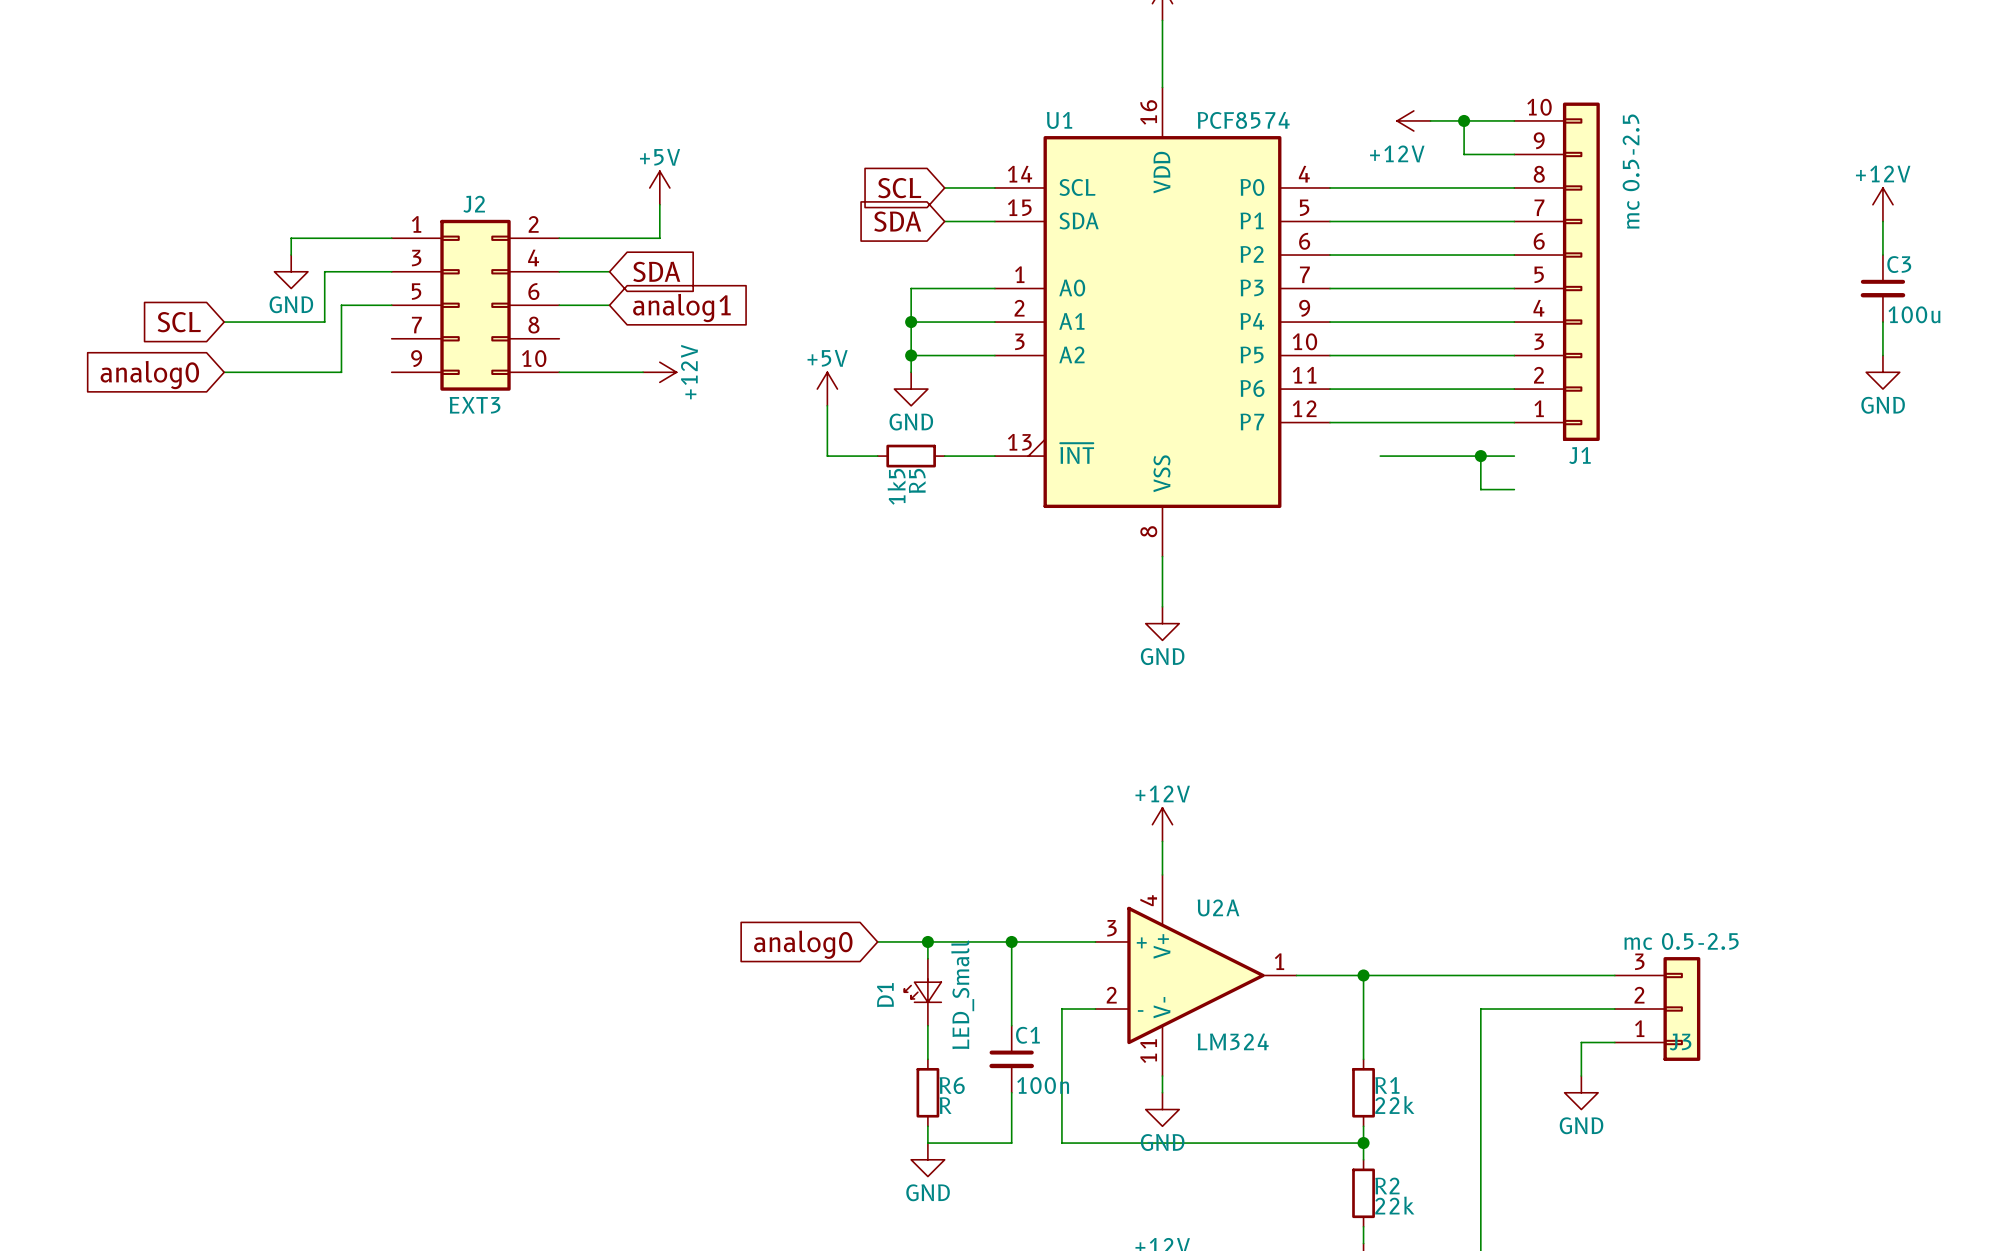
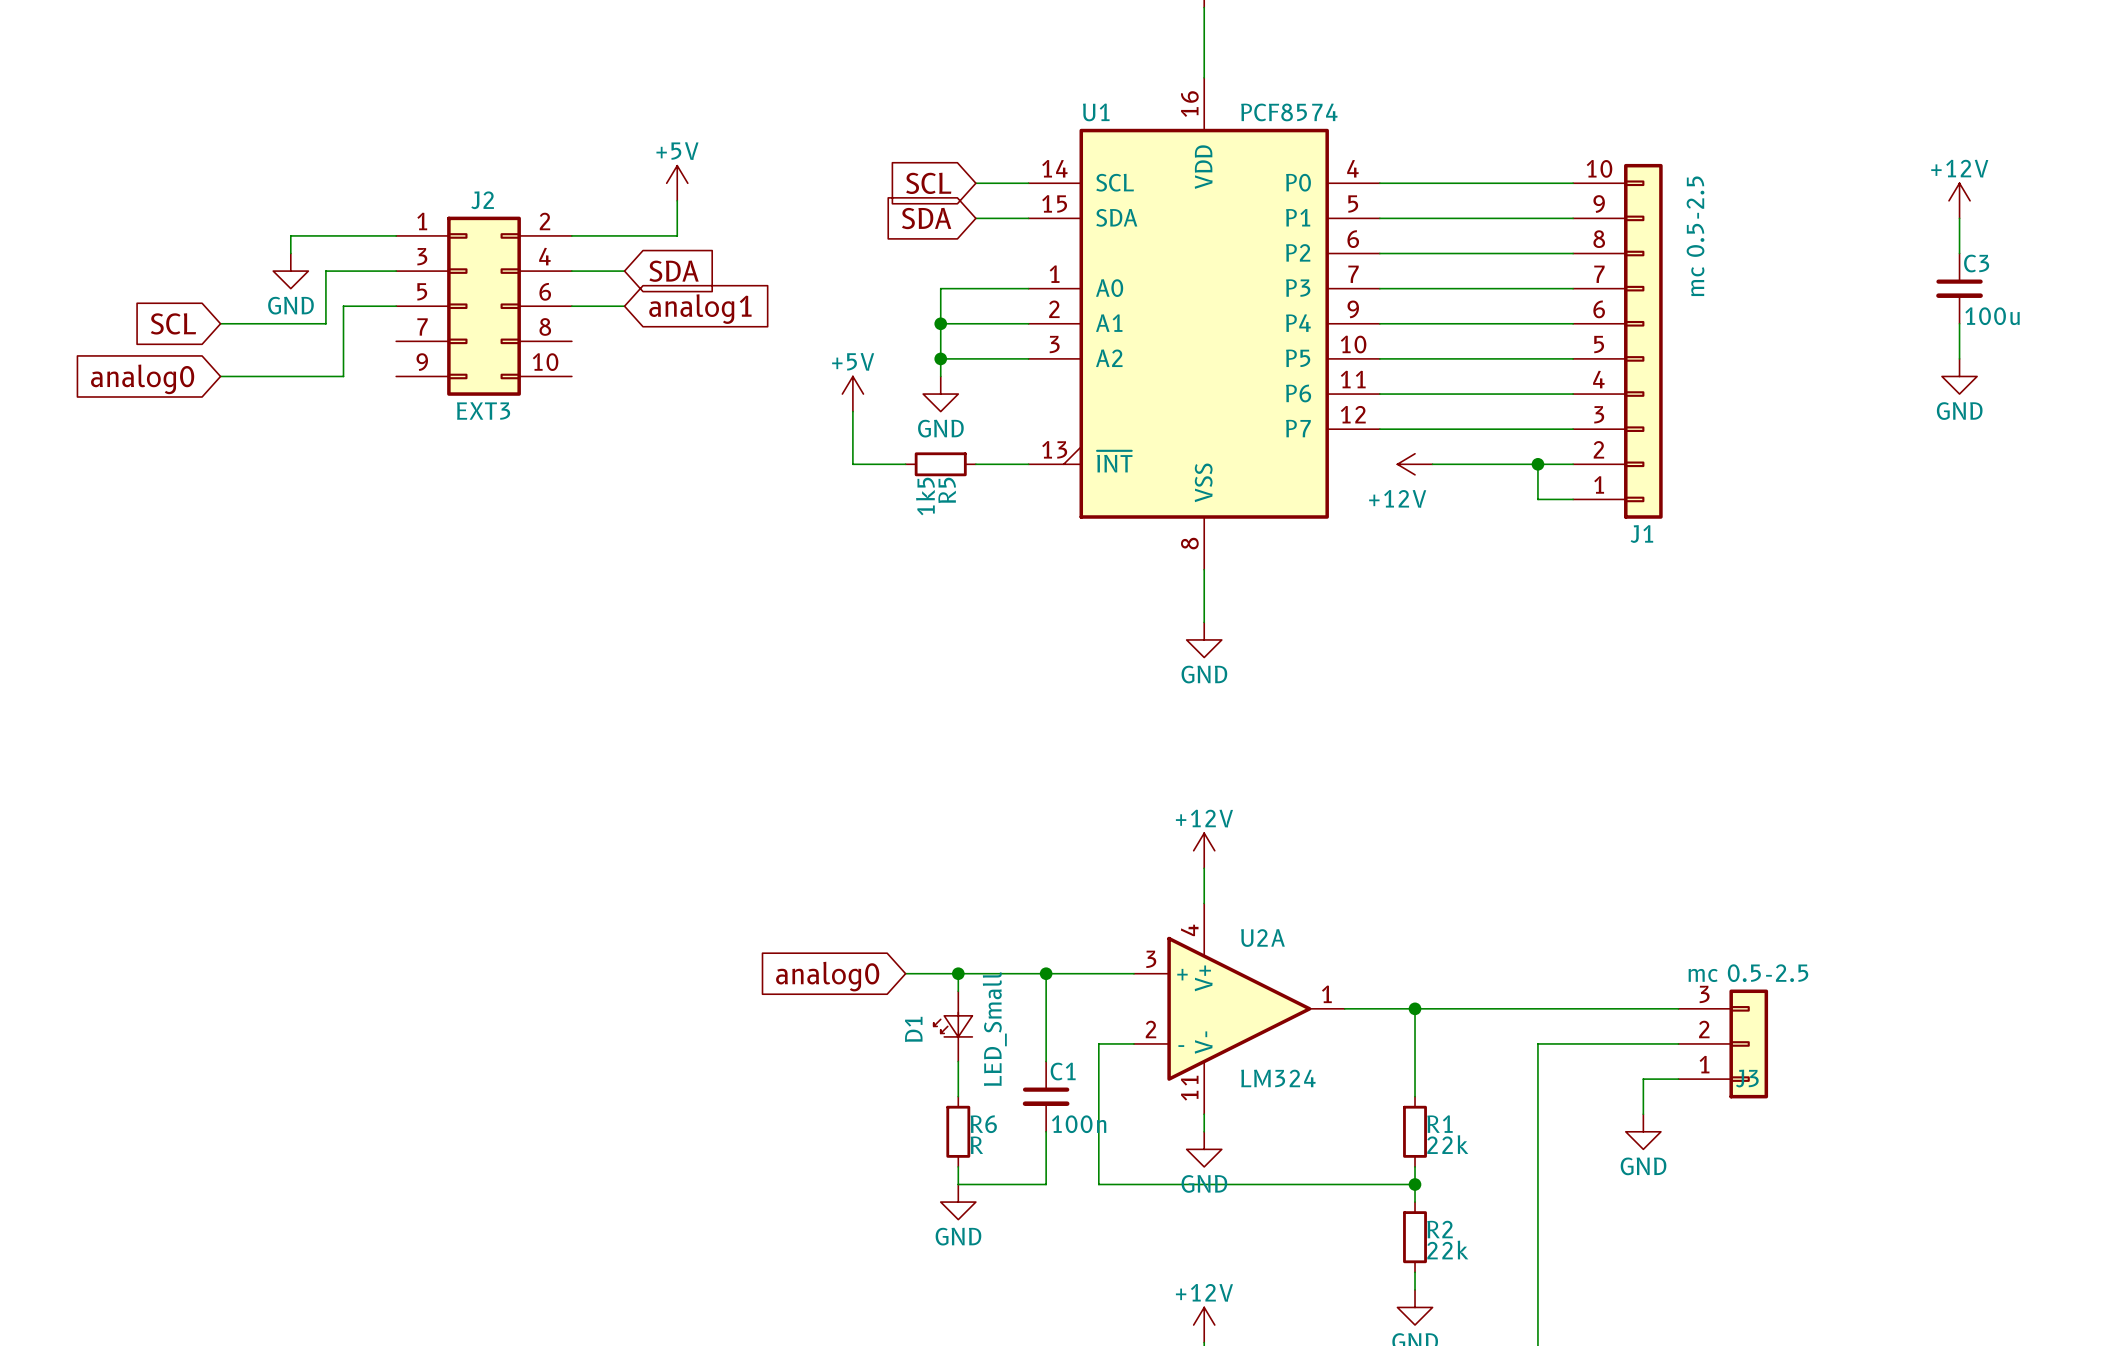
power symbol: +12V (1413, 120) -> none
wire: (1430, 120) (1514, 120) -> none
wire: (1464, 120) (1464, 154) (1514, 154) -> none
junction: (1464, 120) -> none
J1 position: (1557, 271) -> (1617, 341)
wire: (559, 372) (643, 372) -> none
power symbol: +12V (659, 372) -> none
power symbol: none -> +12V (1415, 464)

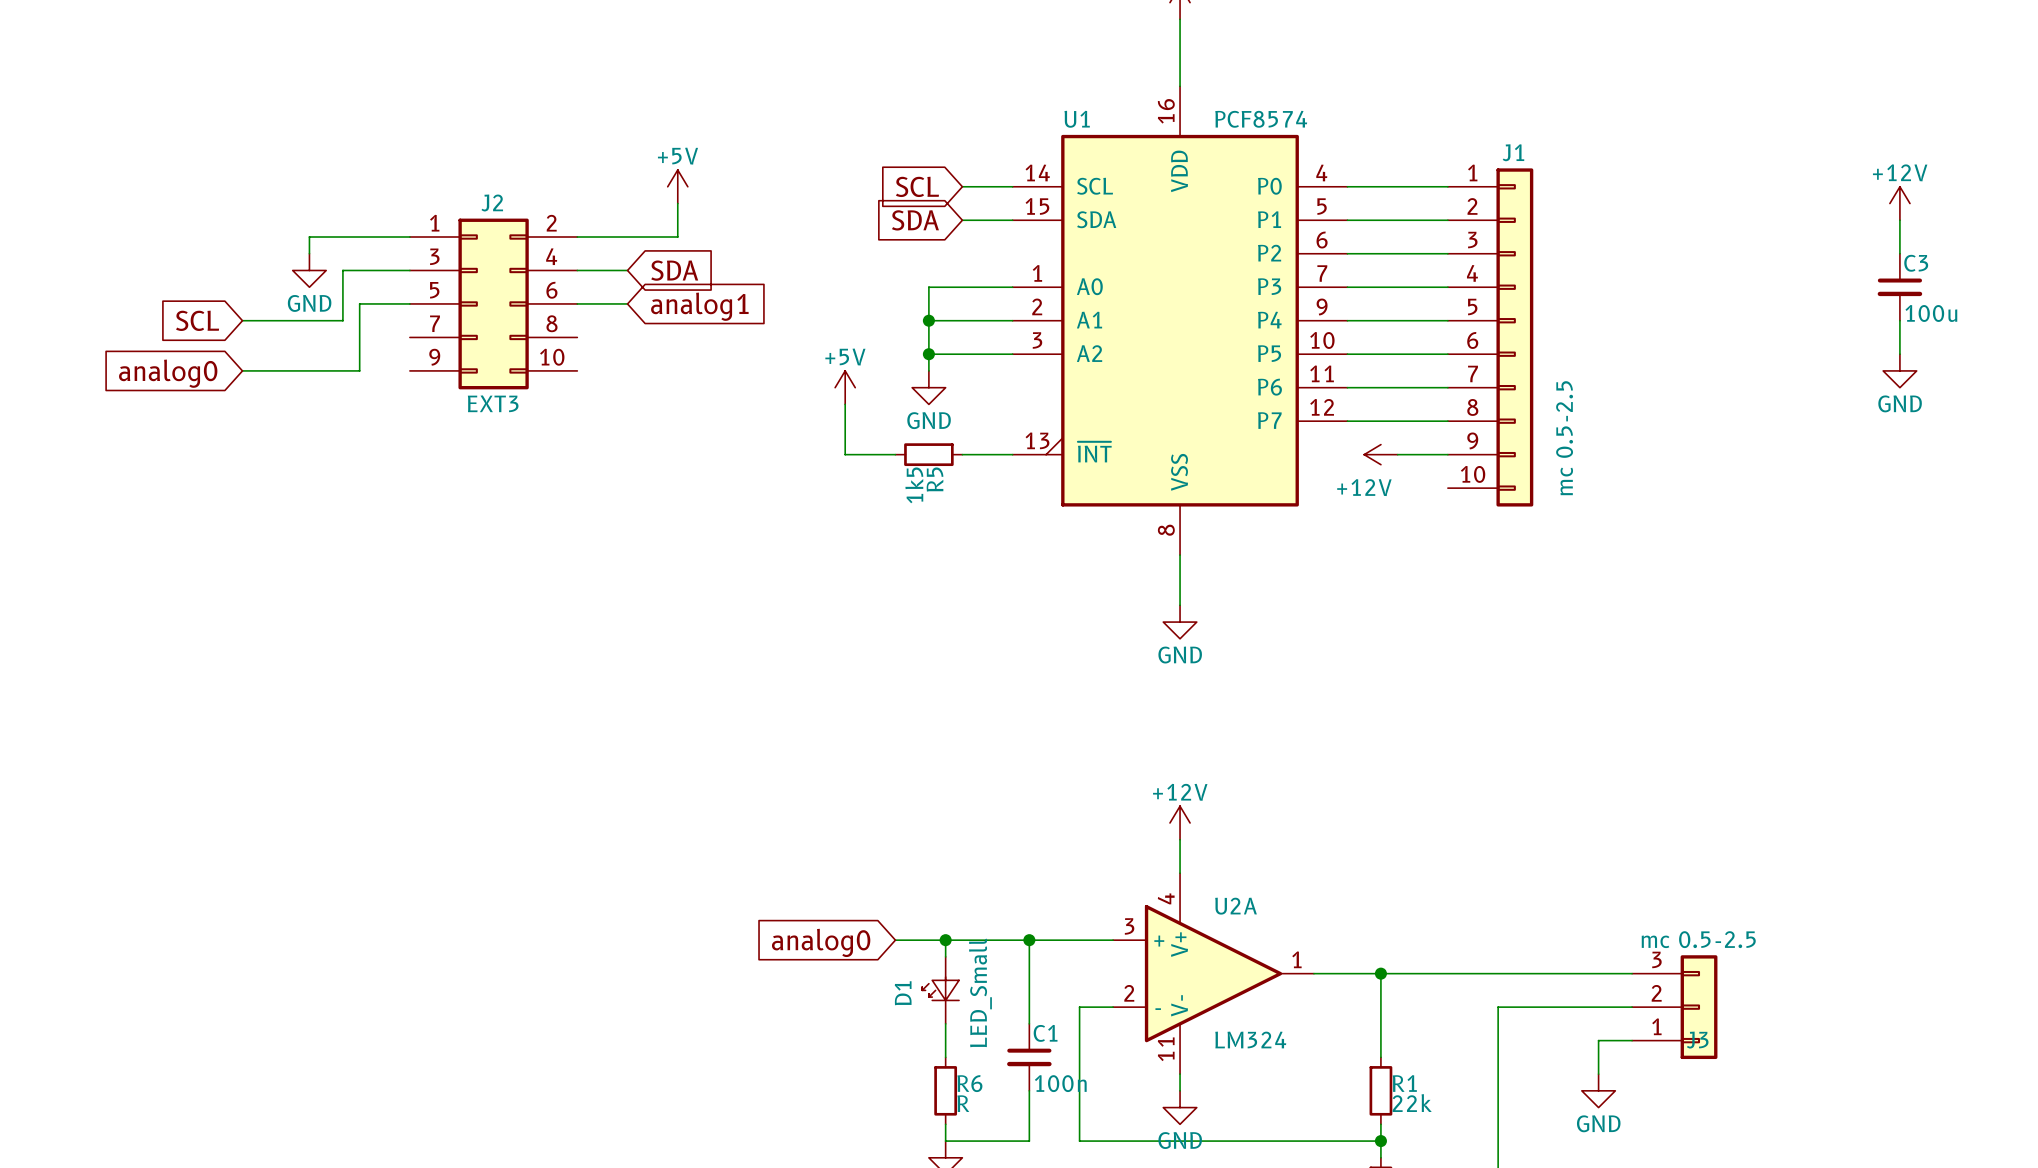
J1 flip: as is (1643, 341) -> up-down (1514, 337)
junction: (1537, 464) -> none

